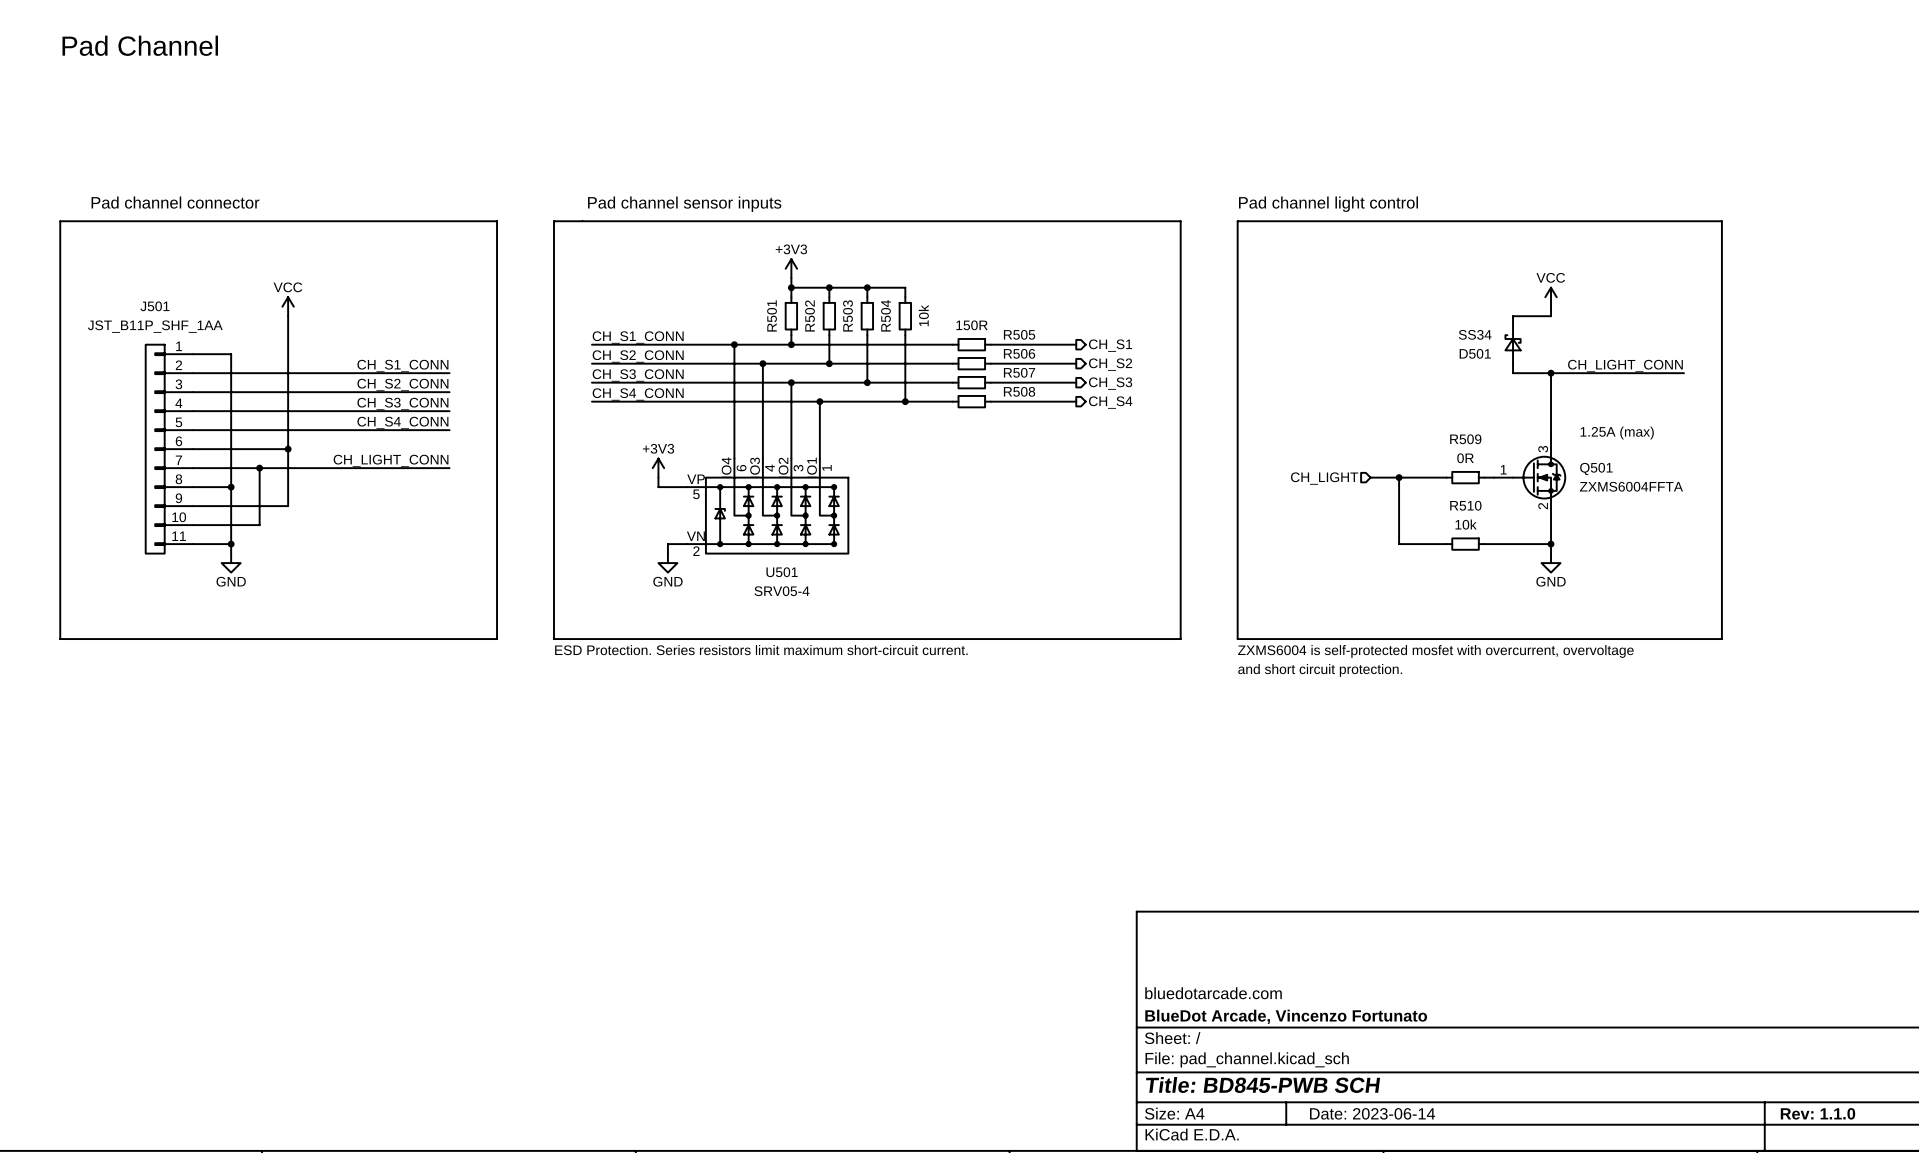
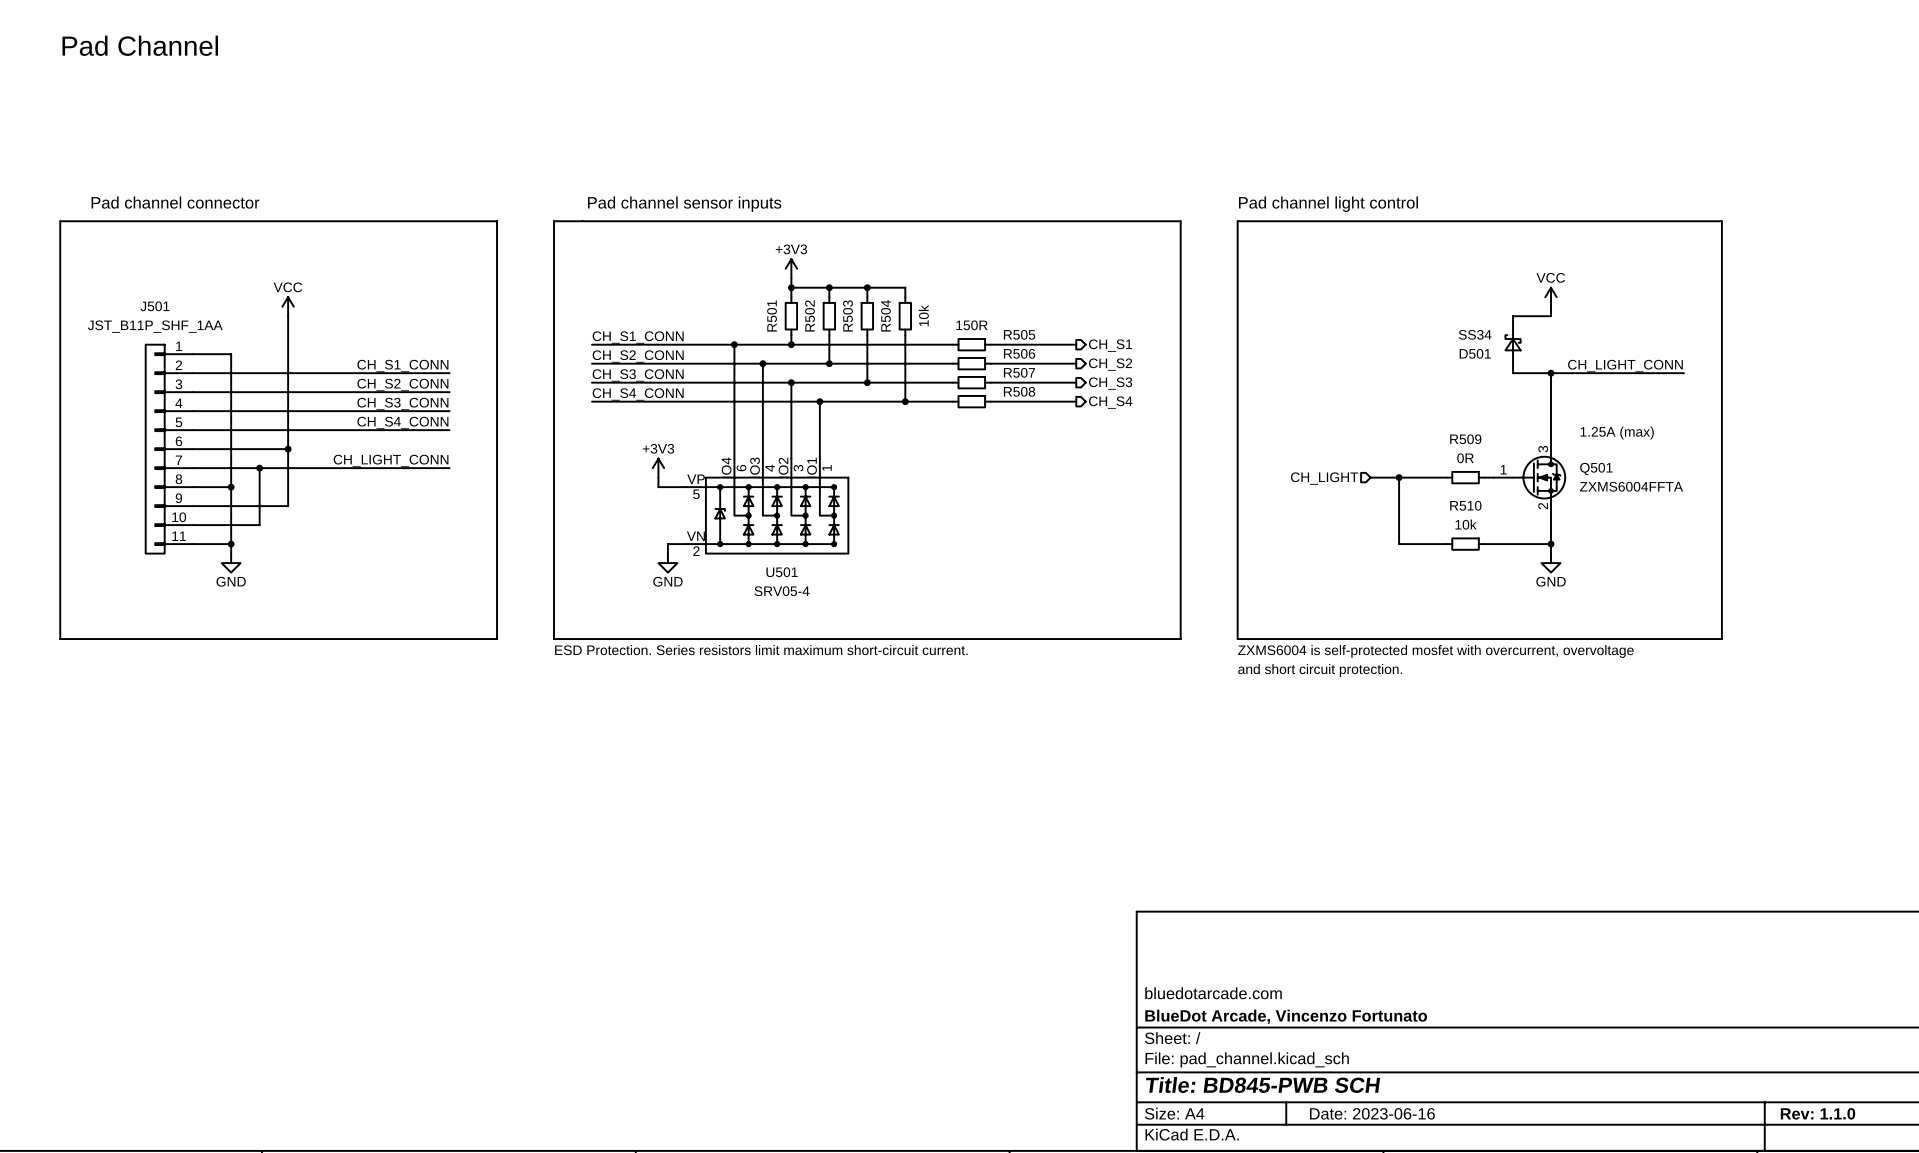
title block: Date: 2023-06-14 (1372, 1113) -> Date: 2023-06-16 (1372, 1113)

